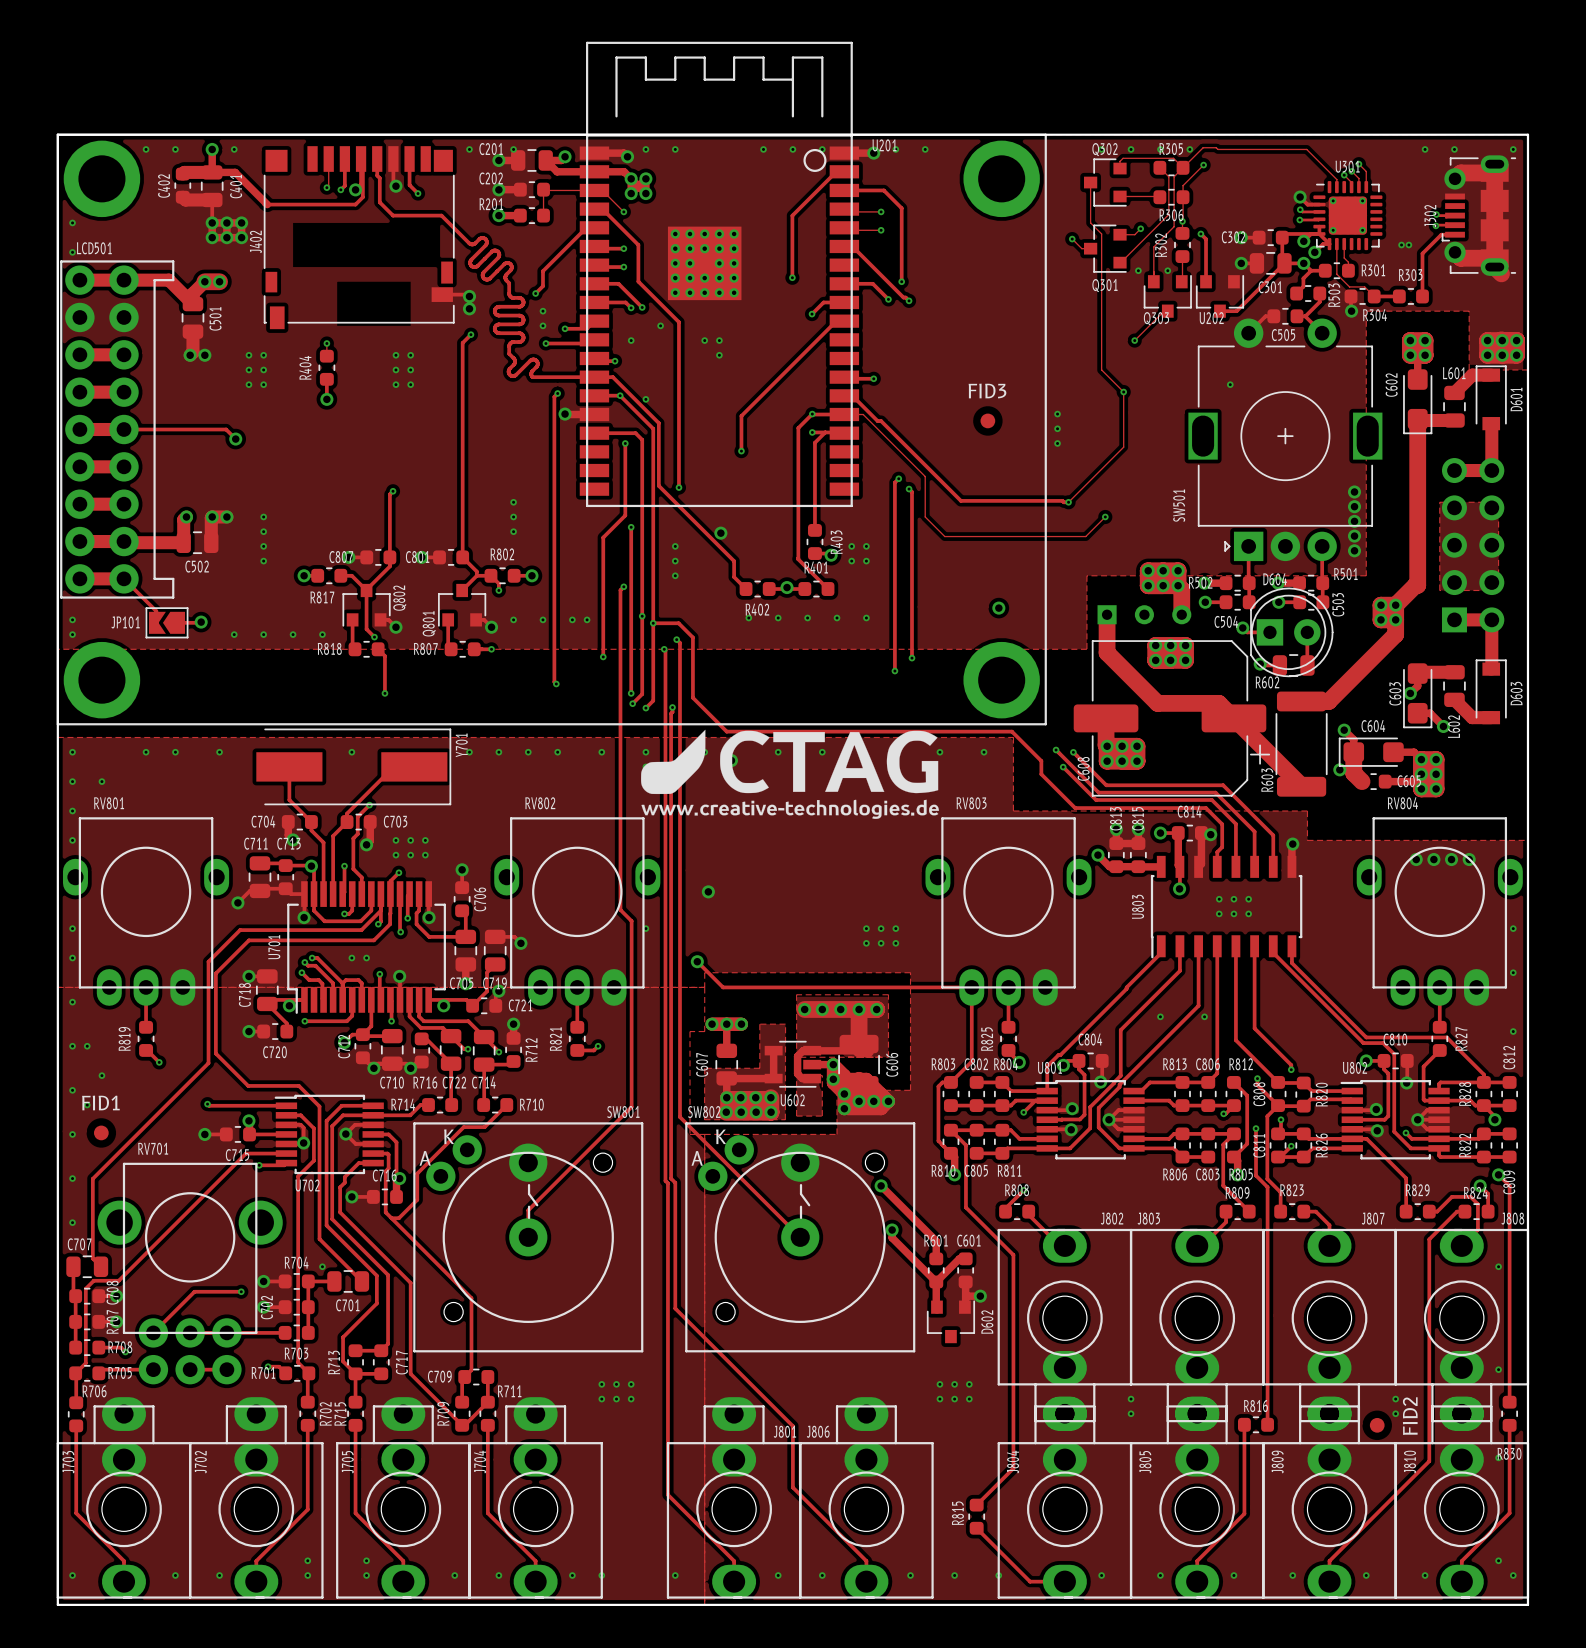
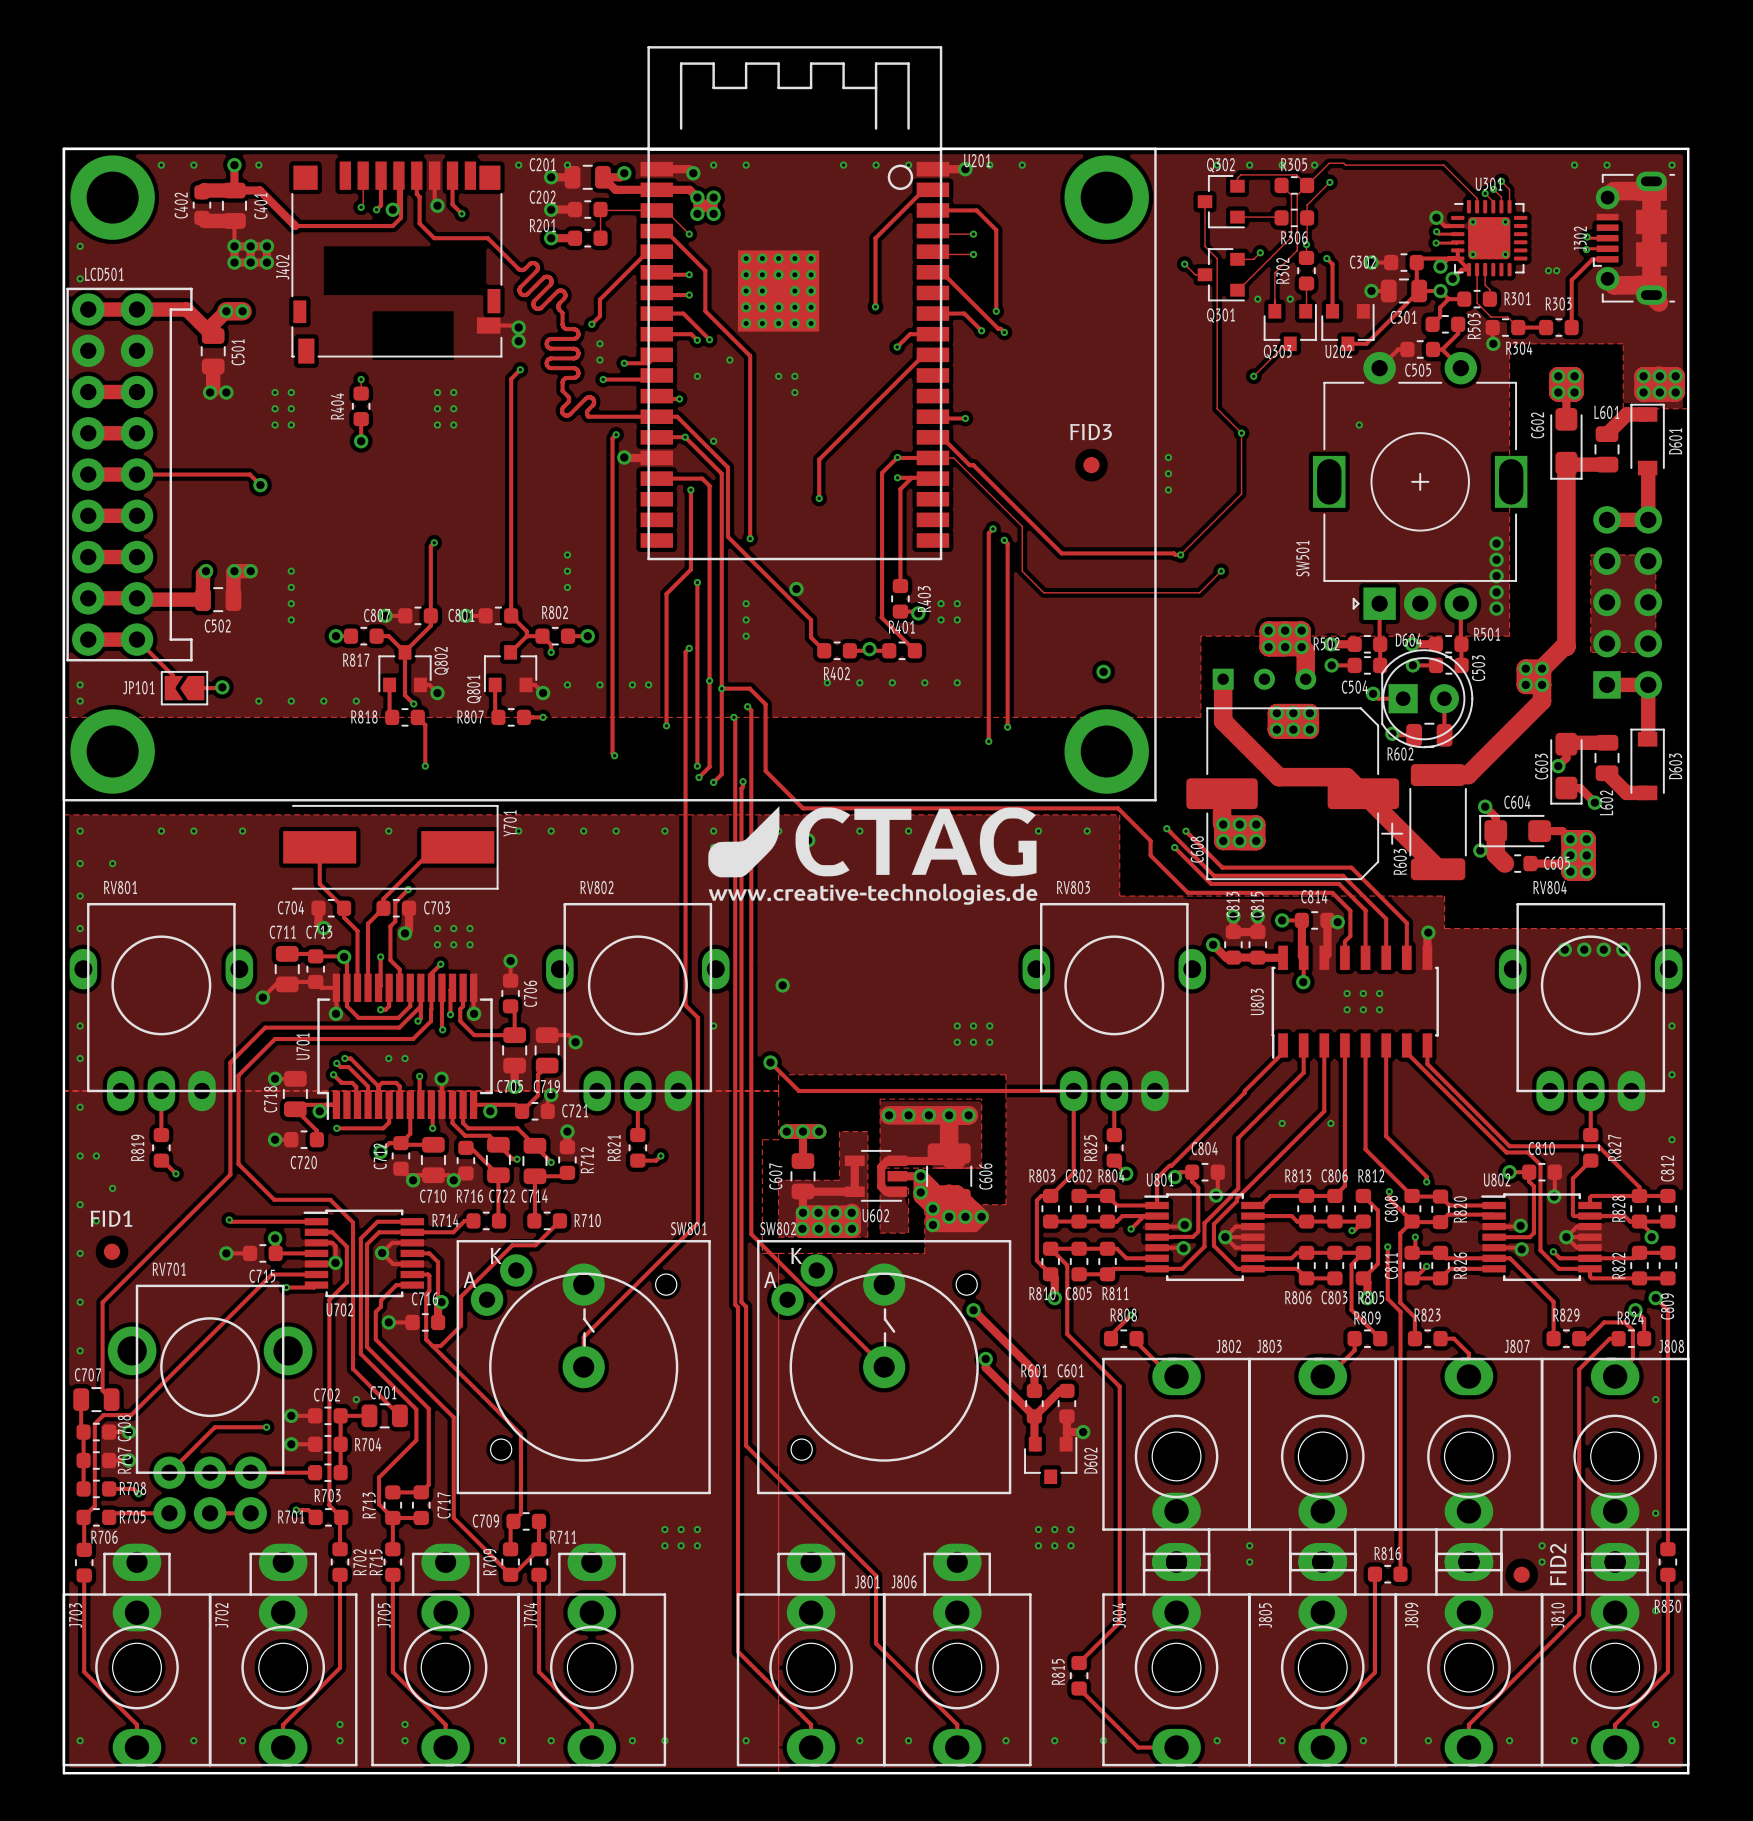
R704 name position: R704 (296, 1262) -> R704 (368, 1444)
C701 name position: C701 (347, 1305) -> C701 (383, 1392)
C702 name rotation: 0° (266, 1307) -> 90° clockwise (326, 1394)
C702 name position: C702 (266, 1307) -> C702 (326, 1394)

